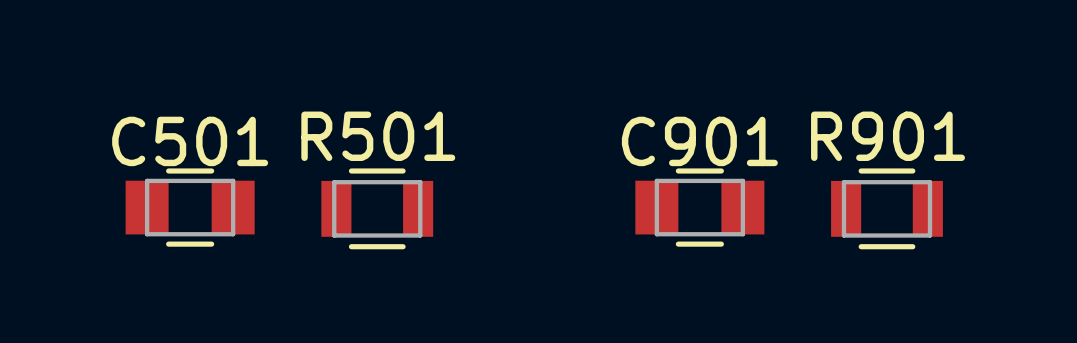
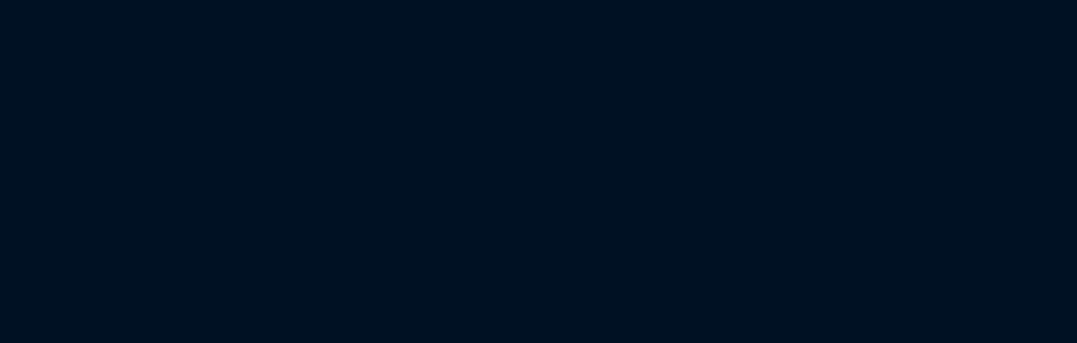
C501: (190, 207) -> none
C901: (699, 207) -> none
R501: (377, 208) -> none
R901: (886, 208) -> none

